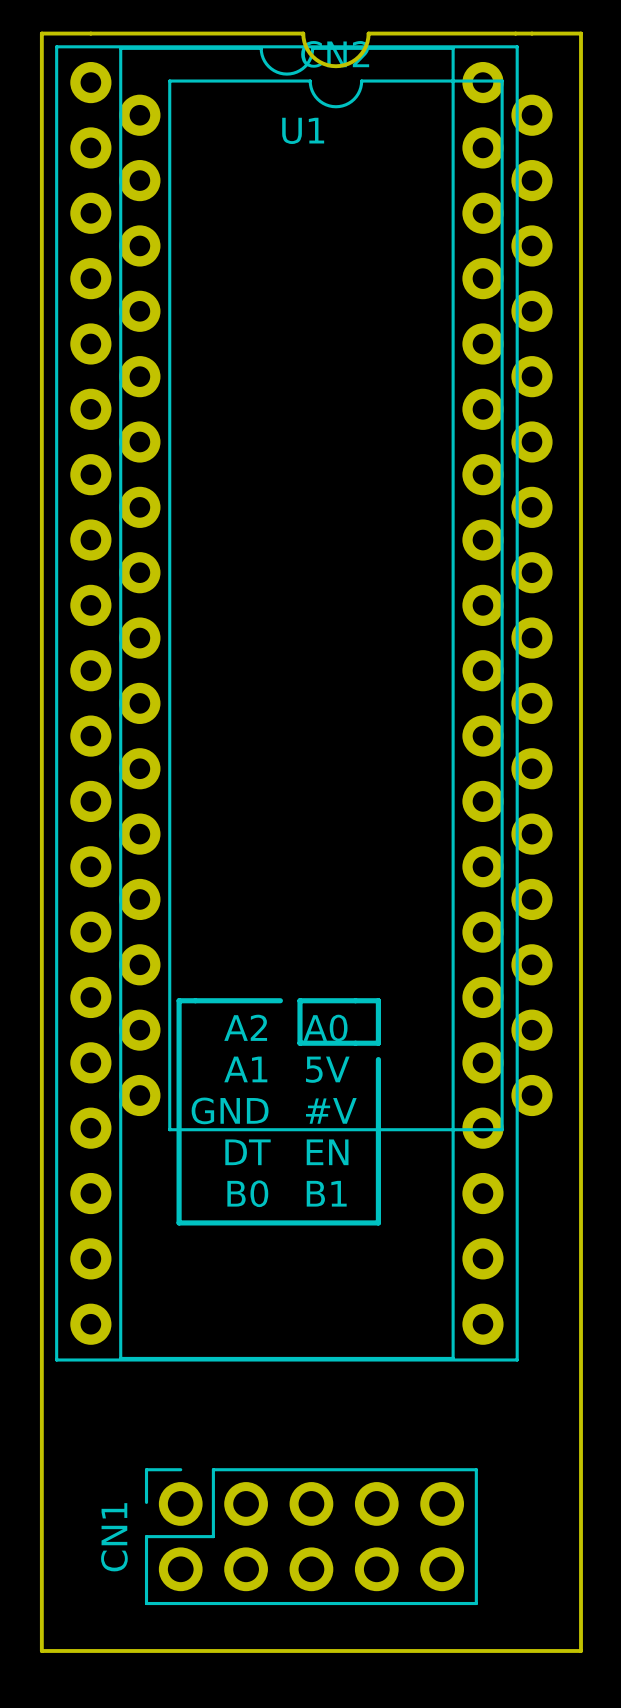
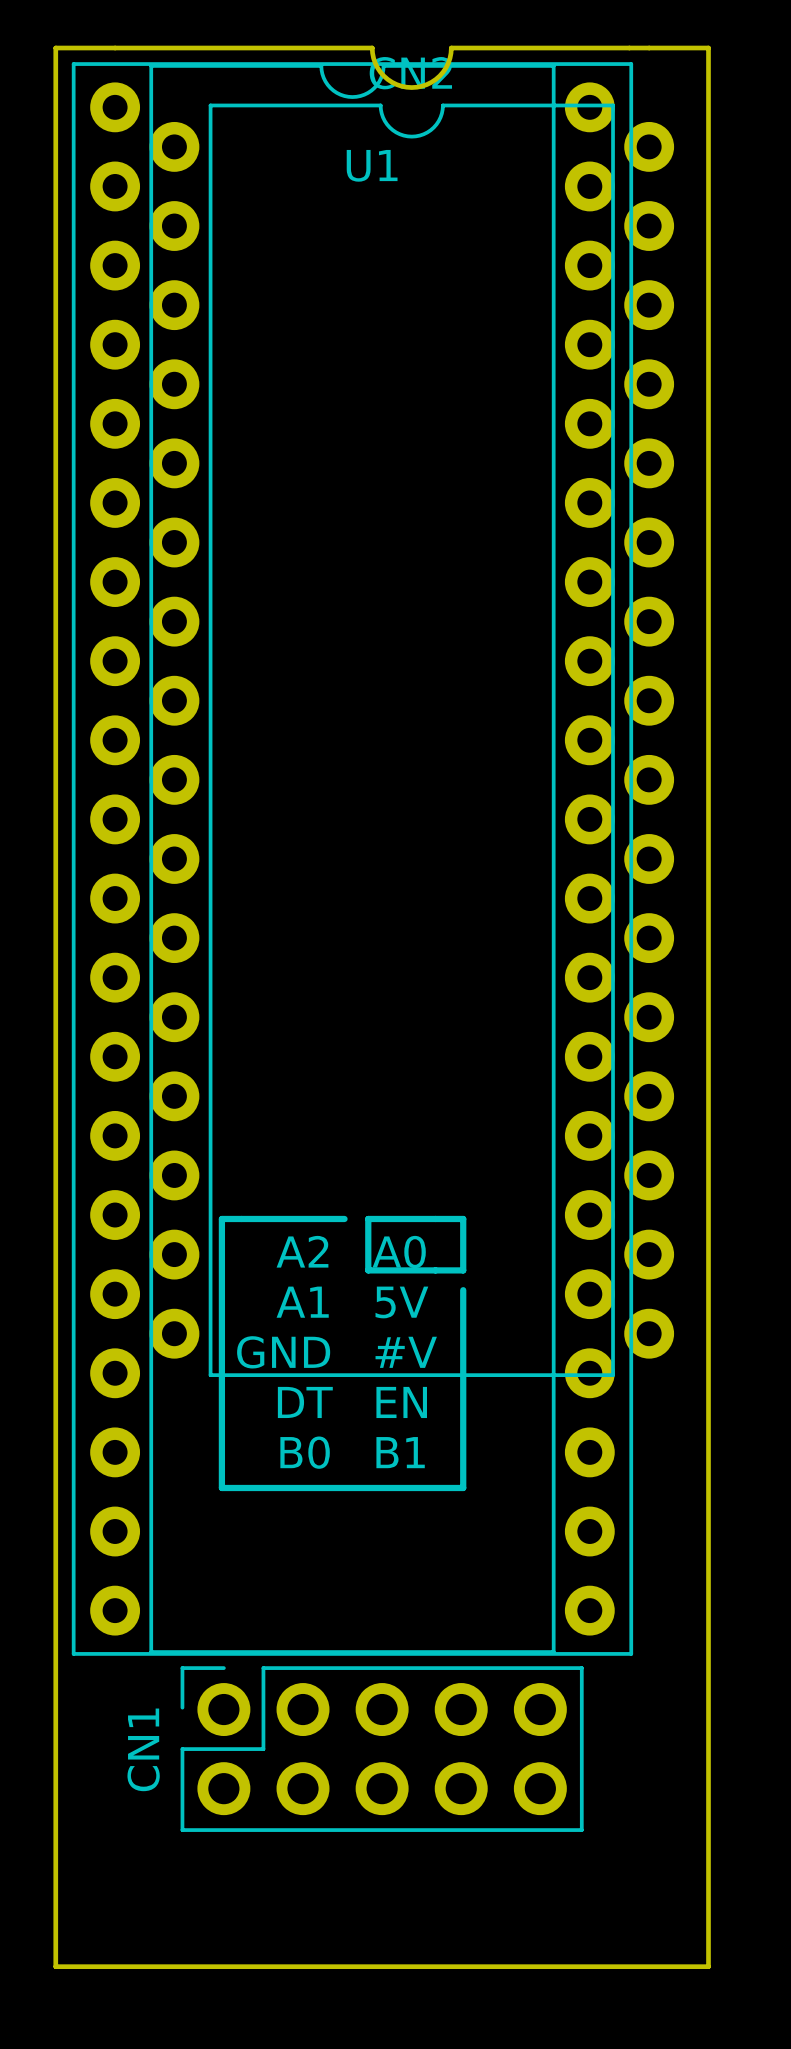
CN1 position: (311, 1536) -> (382, 1749)
board edge: (41, 1618) (41, 1650) (581, 1650) (581, 1618) -> (55, 1966) (708, 1966)

